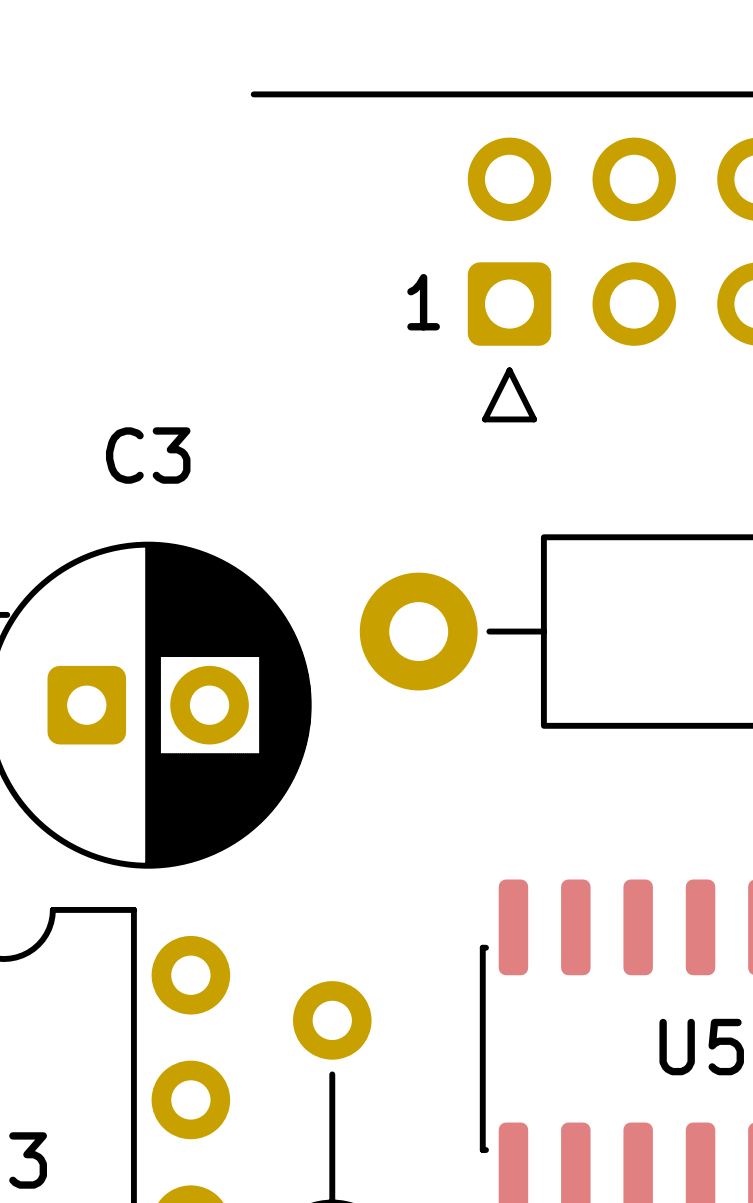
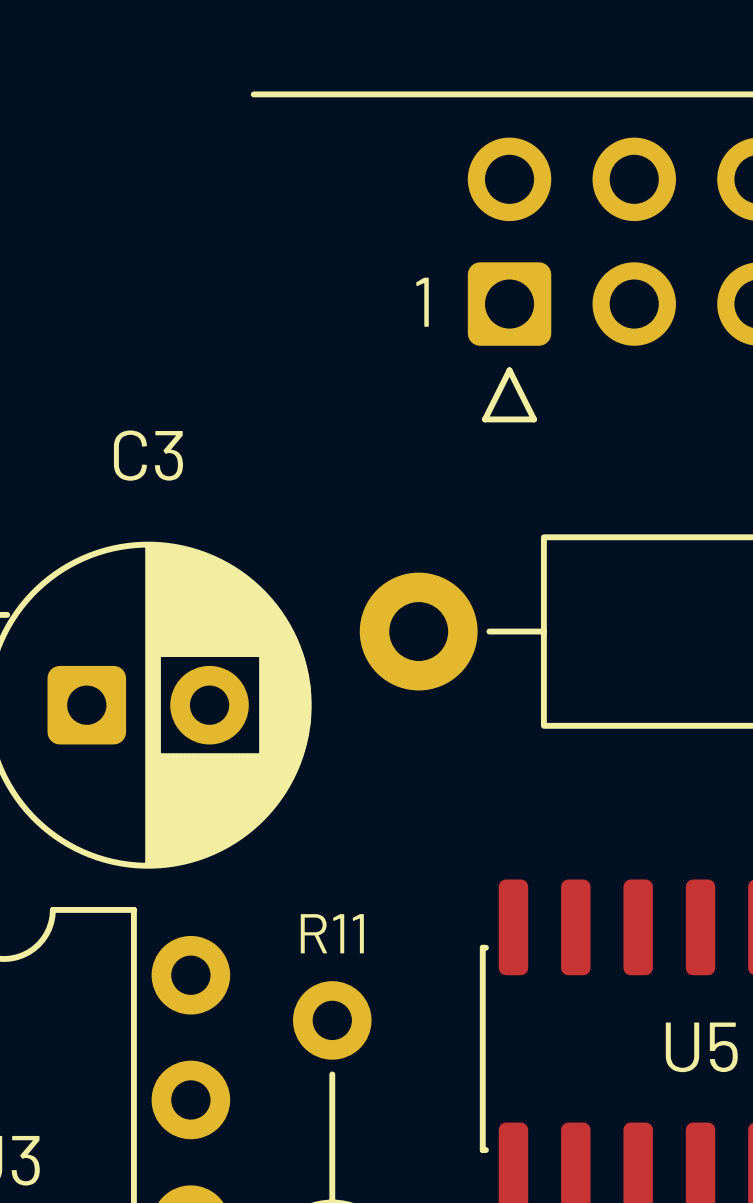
R11 name: none -> R11 (332, 933)

